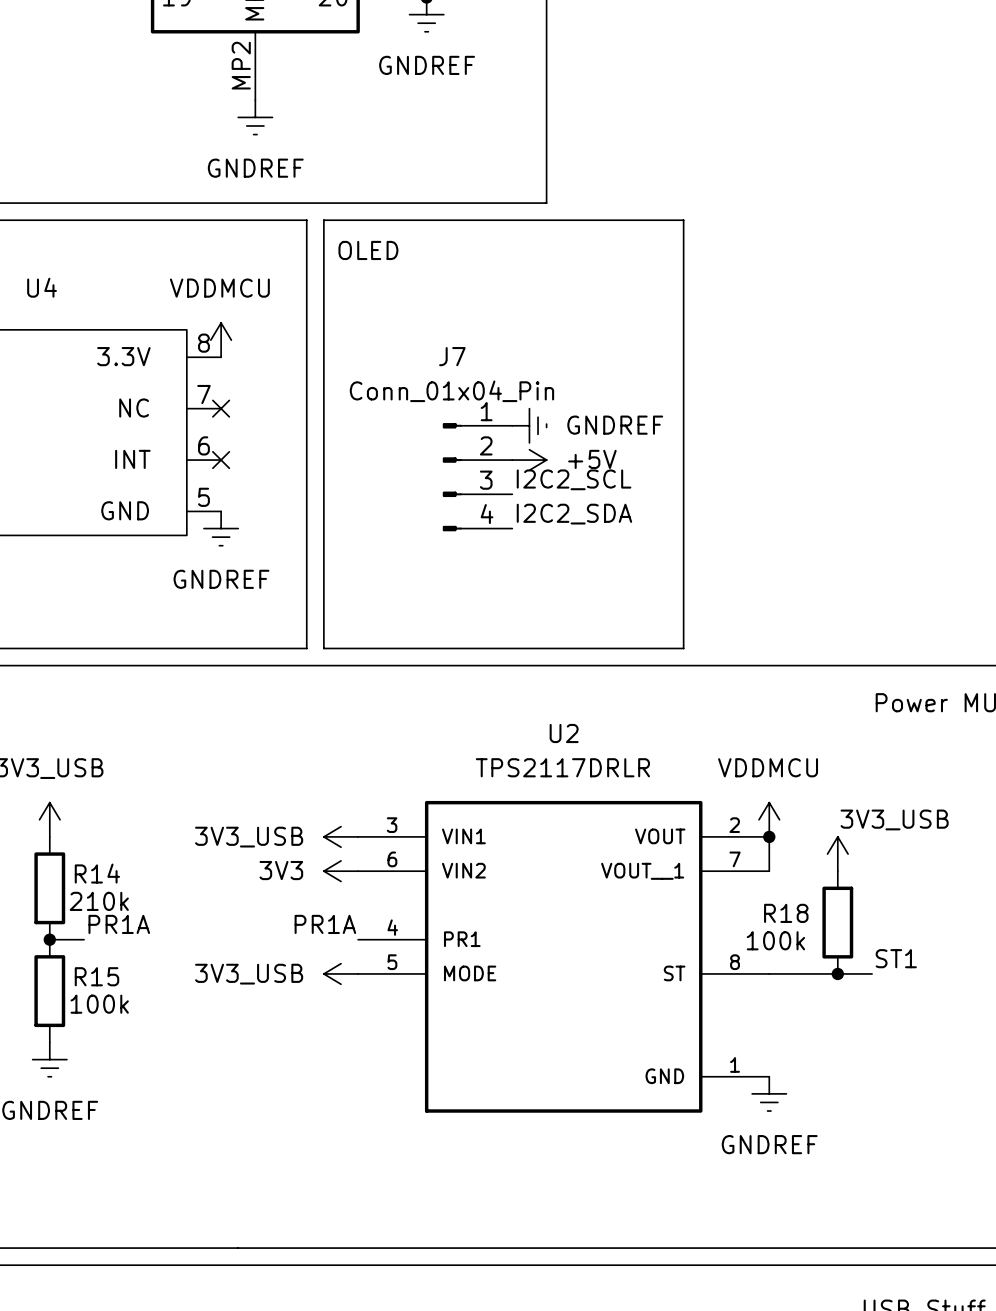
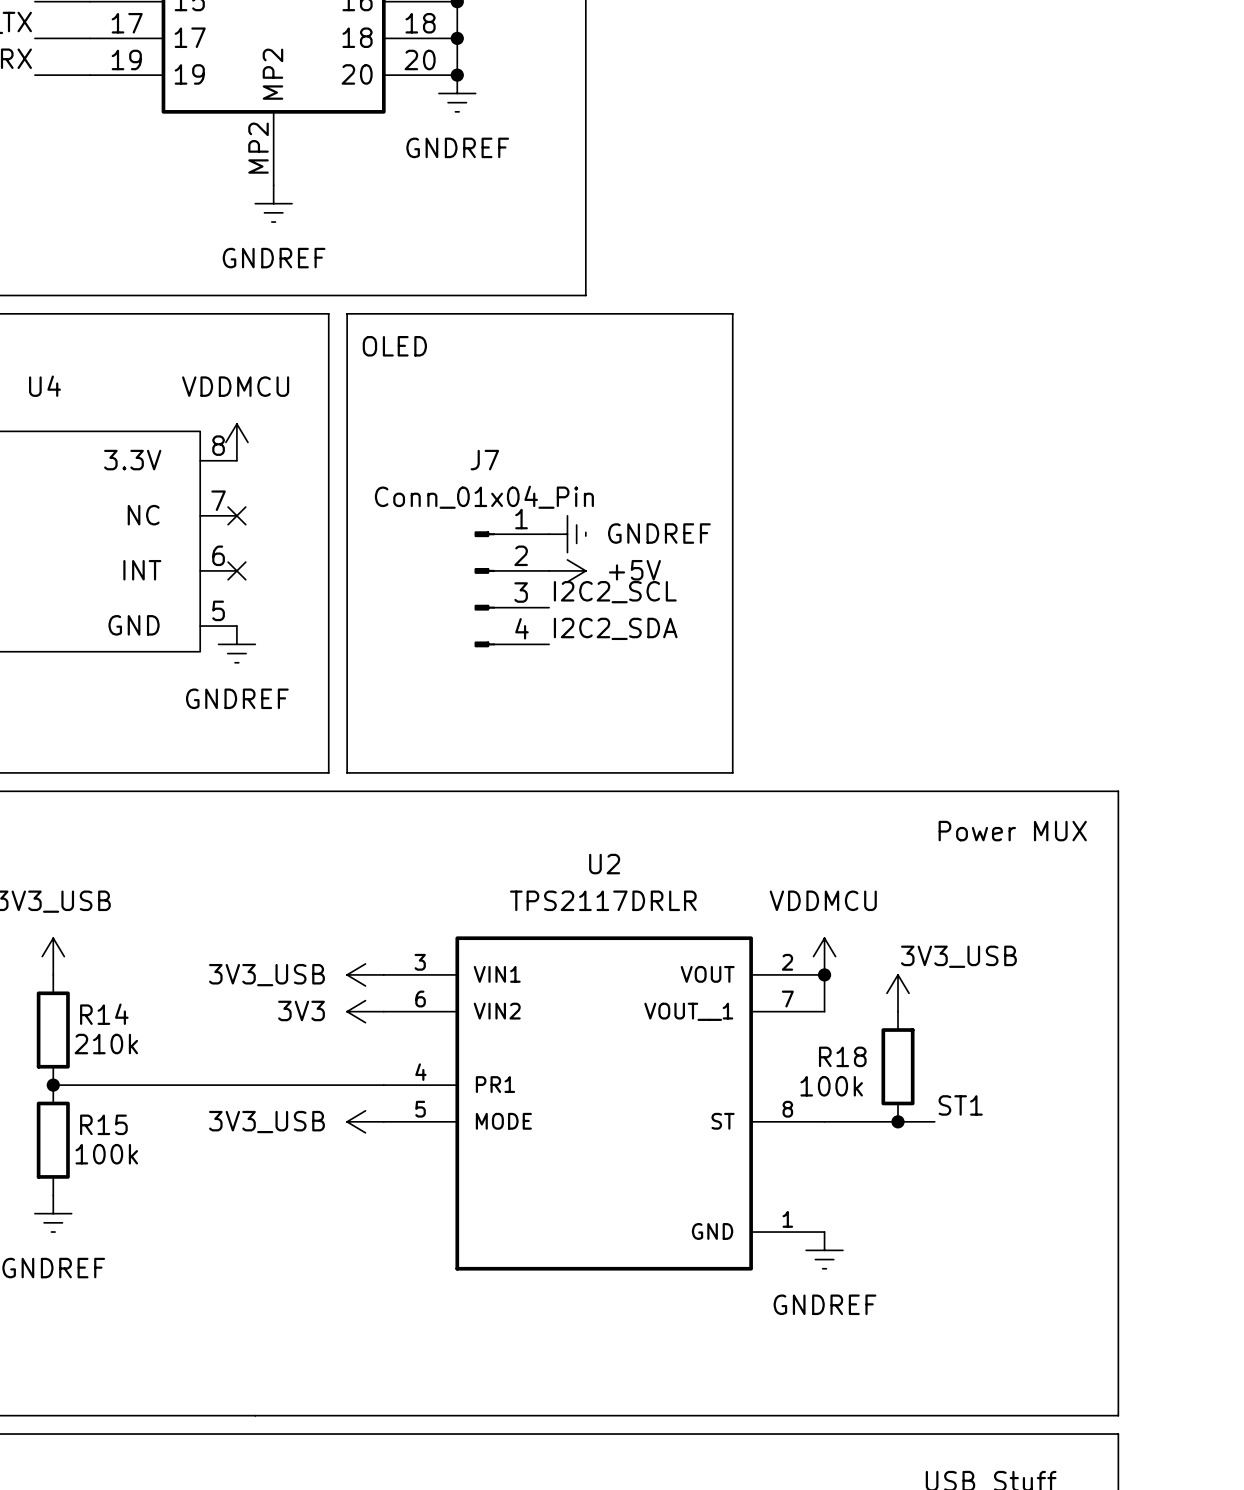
label: PR1A (119, 924) -> none
label: PR1A (325, 924) -> none
wire: none -> (90, 1085) (383, 1085)

